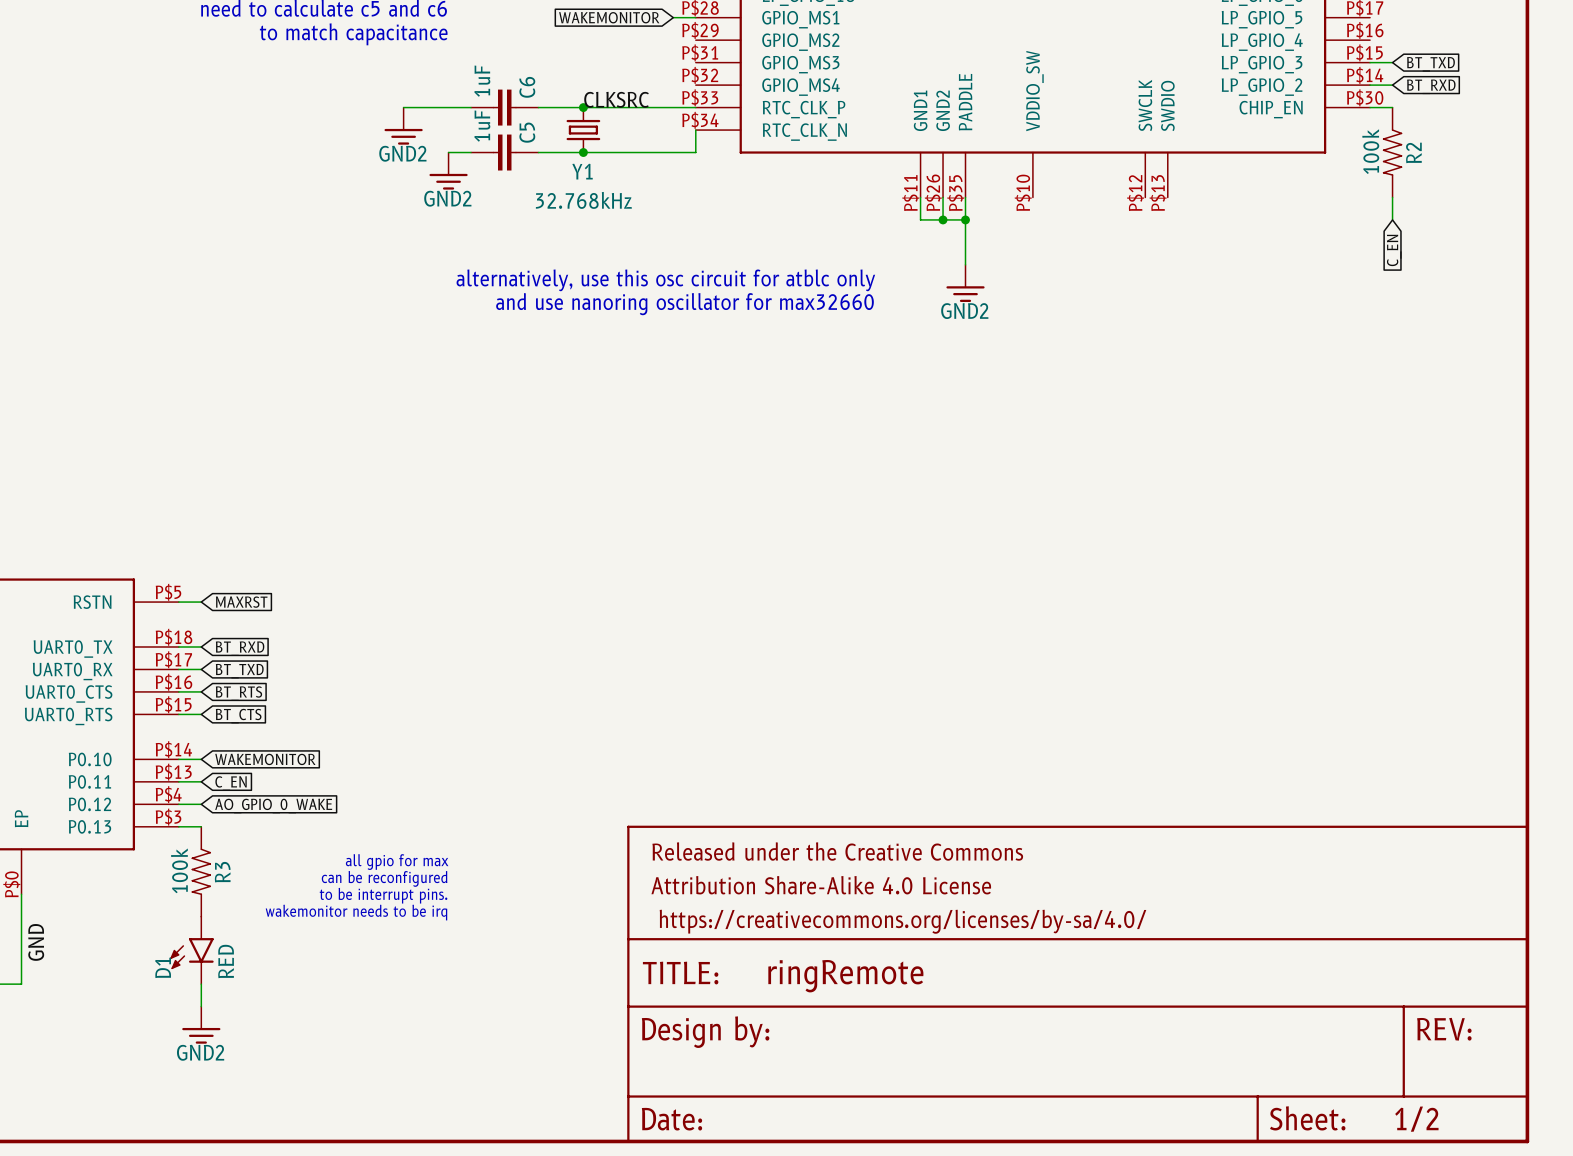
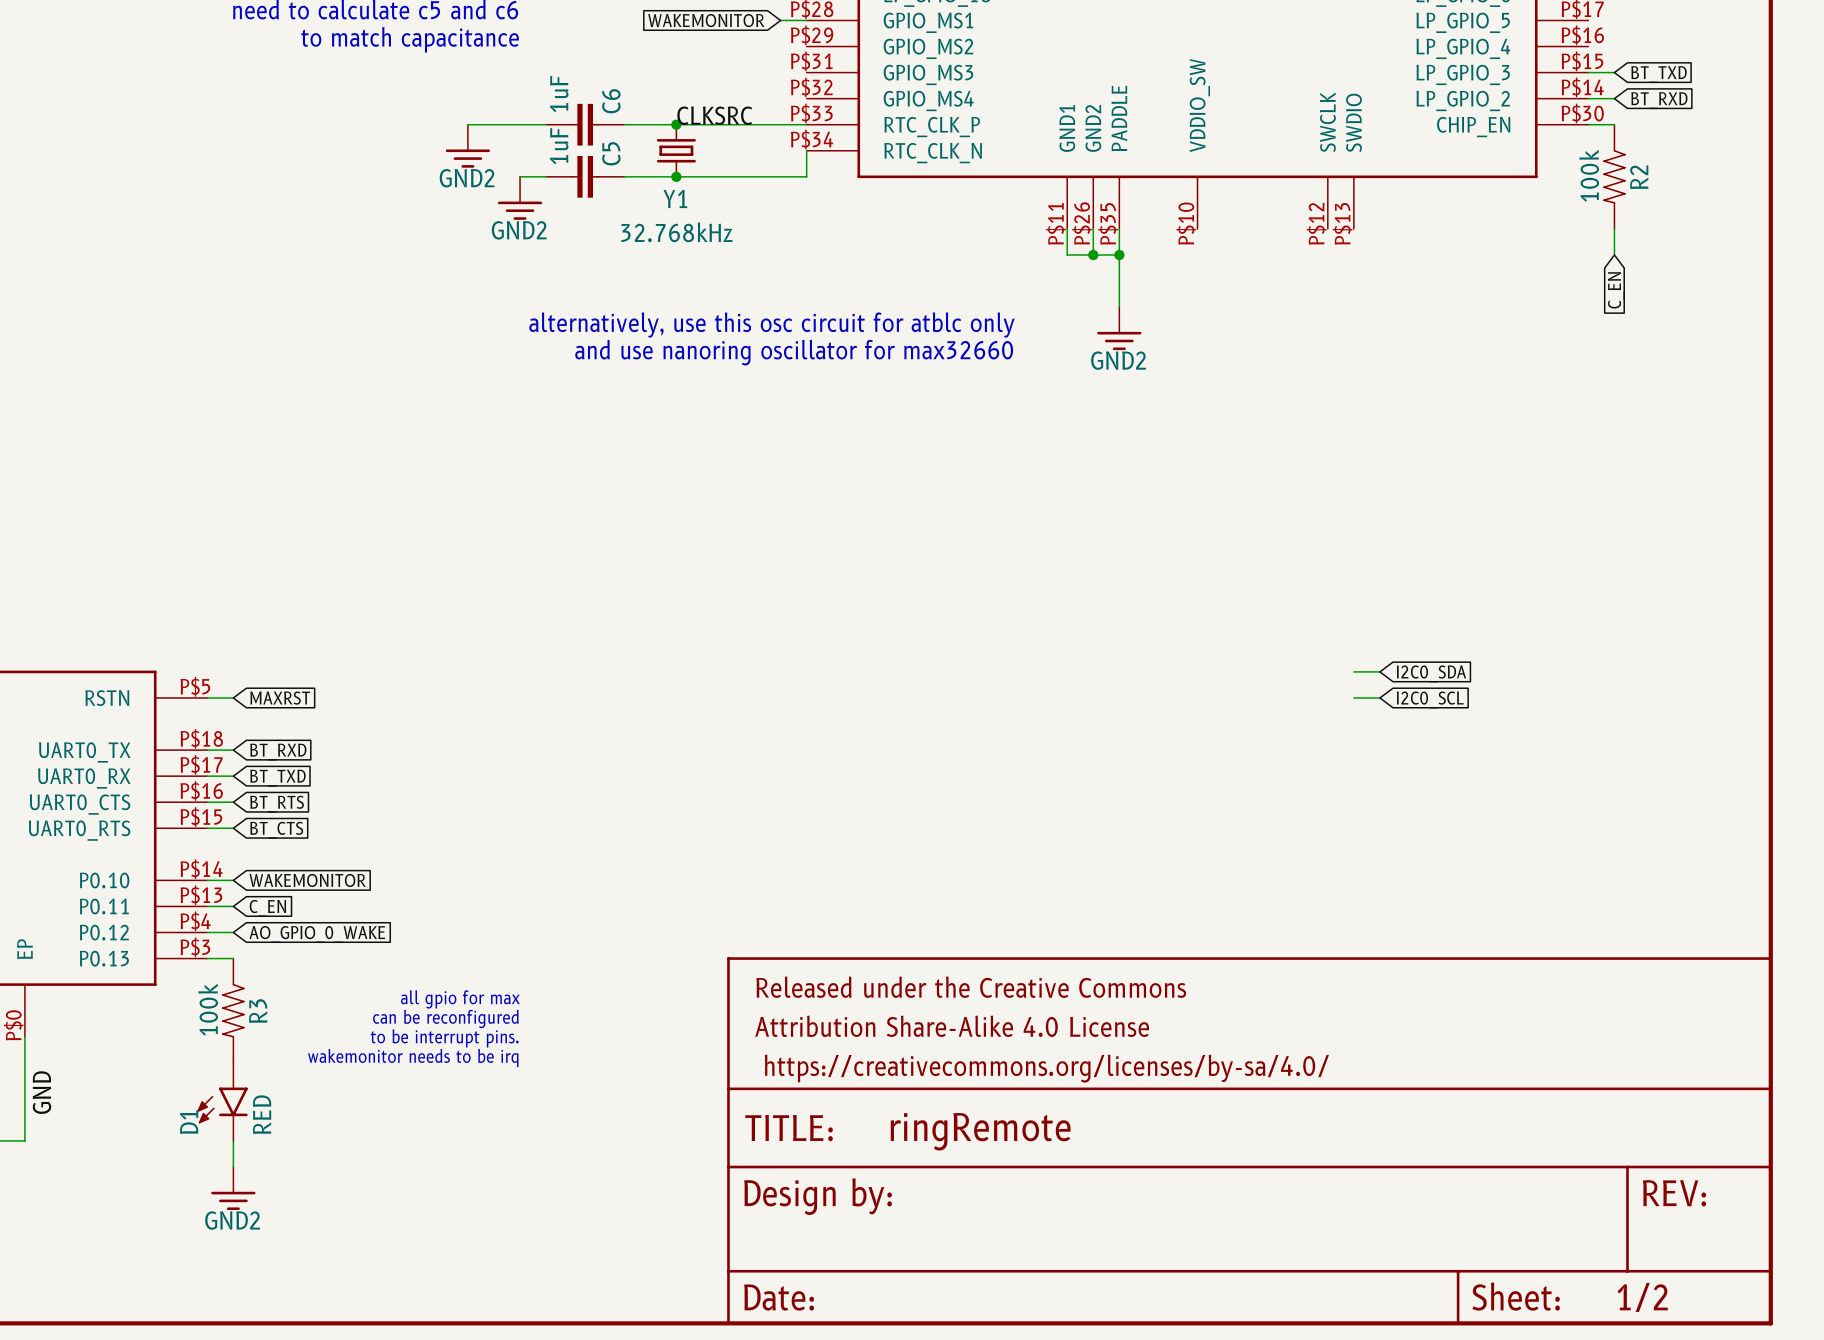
wire: none -> (1353, 671) (1379, 671)
global label: none -> I2C0_SDA (1431, 673)
wire: none -> (1353, 697) (1379, 697)
global label: none -> I2C0_SCL (1430, 699)

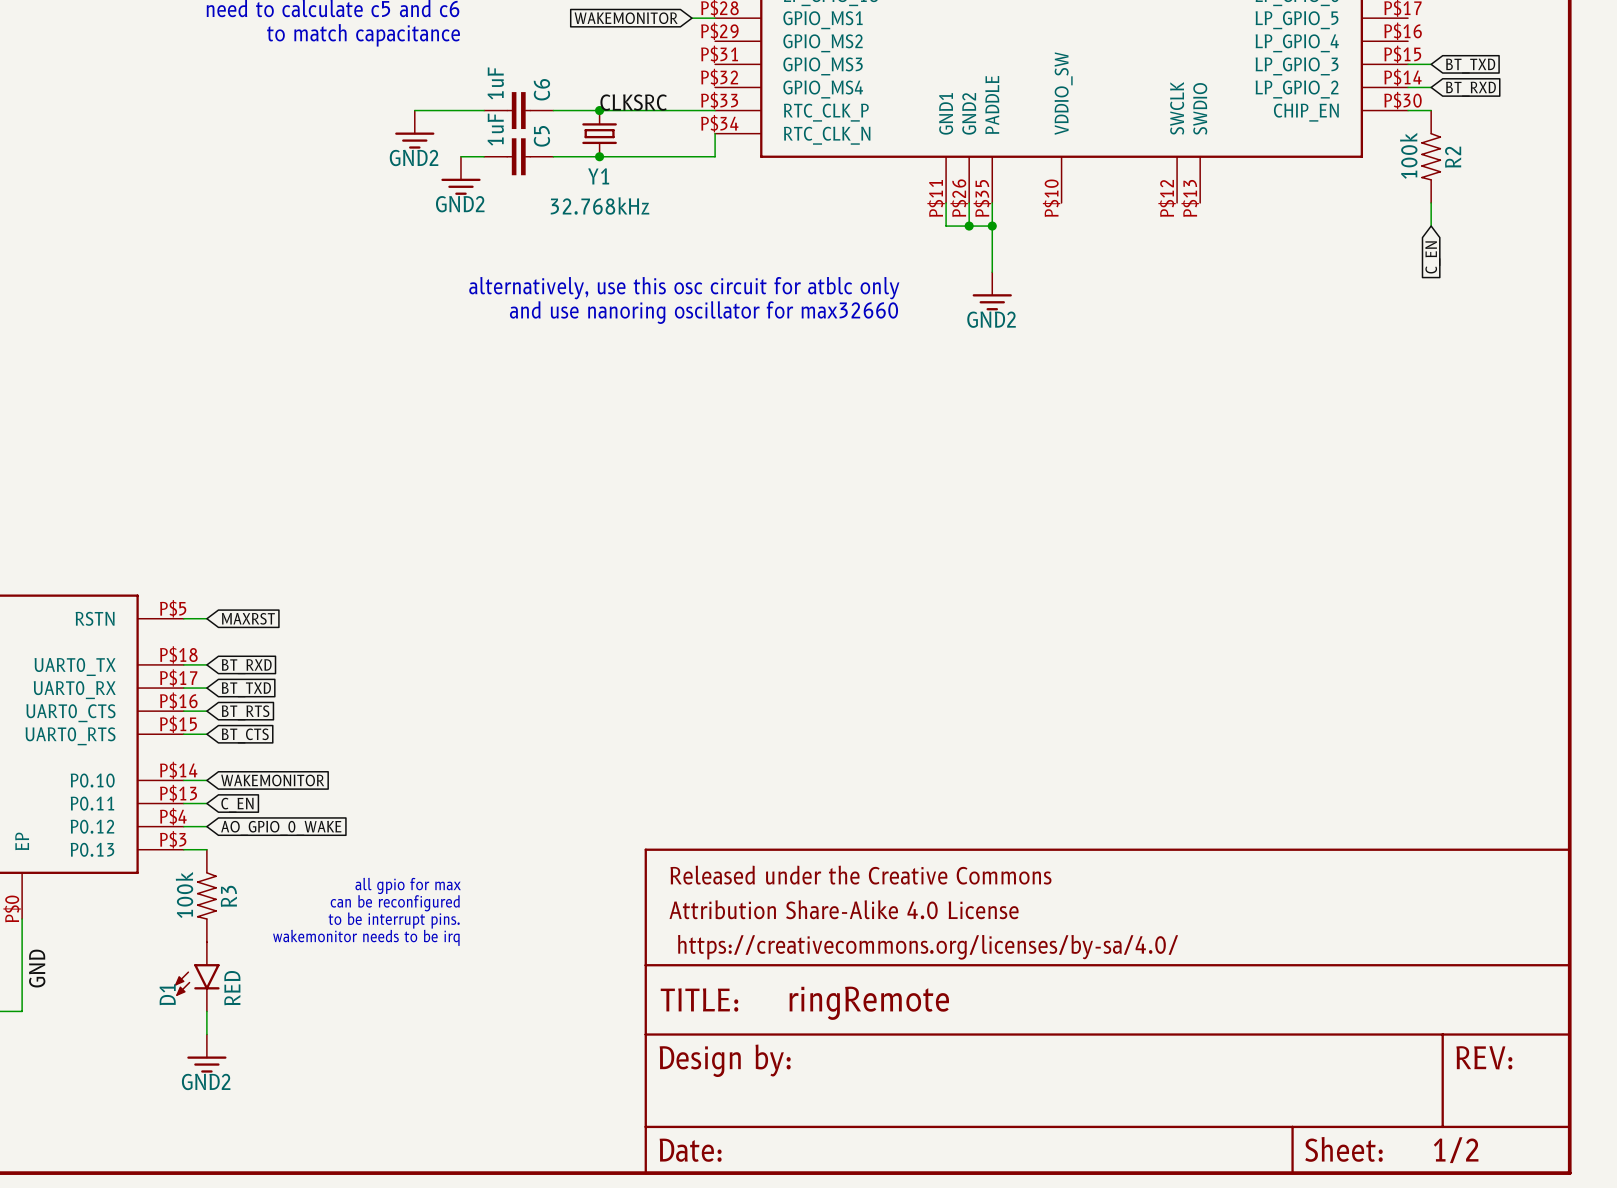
wire: (1353, 671) (1379, 671) -> none
global label: I2C0_SDA (1431, 673) -> none
wire: (1353, 697) (1379, 697) -> none
global label: I2C0_SCL (1430, 699) -> none

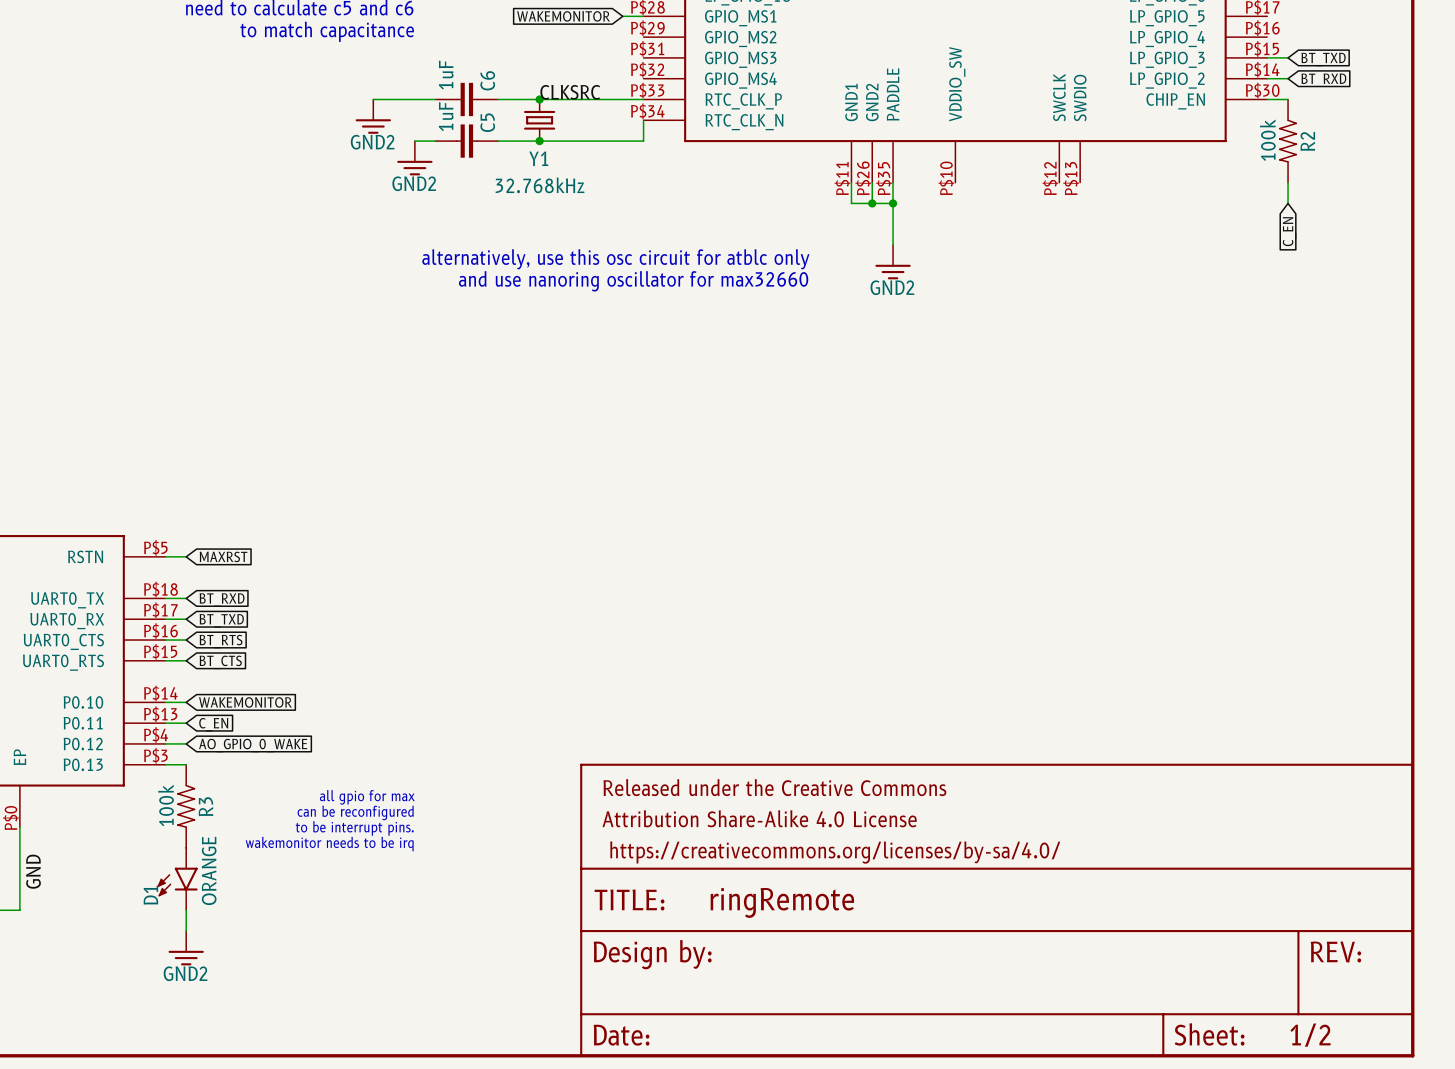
D1 value: RED (232, 988) -> ORANGE (209, 870)

